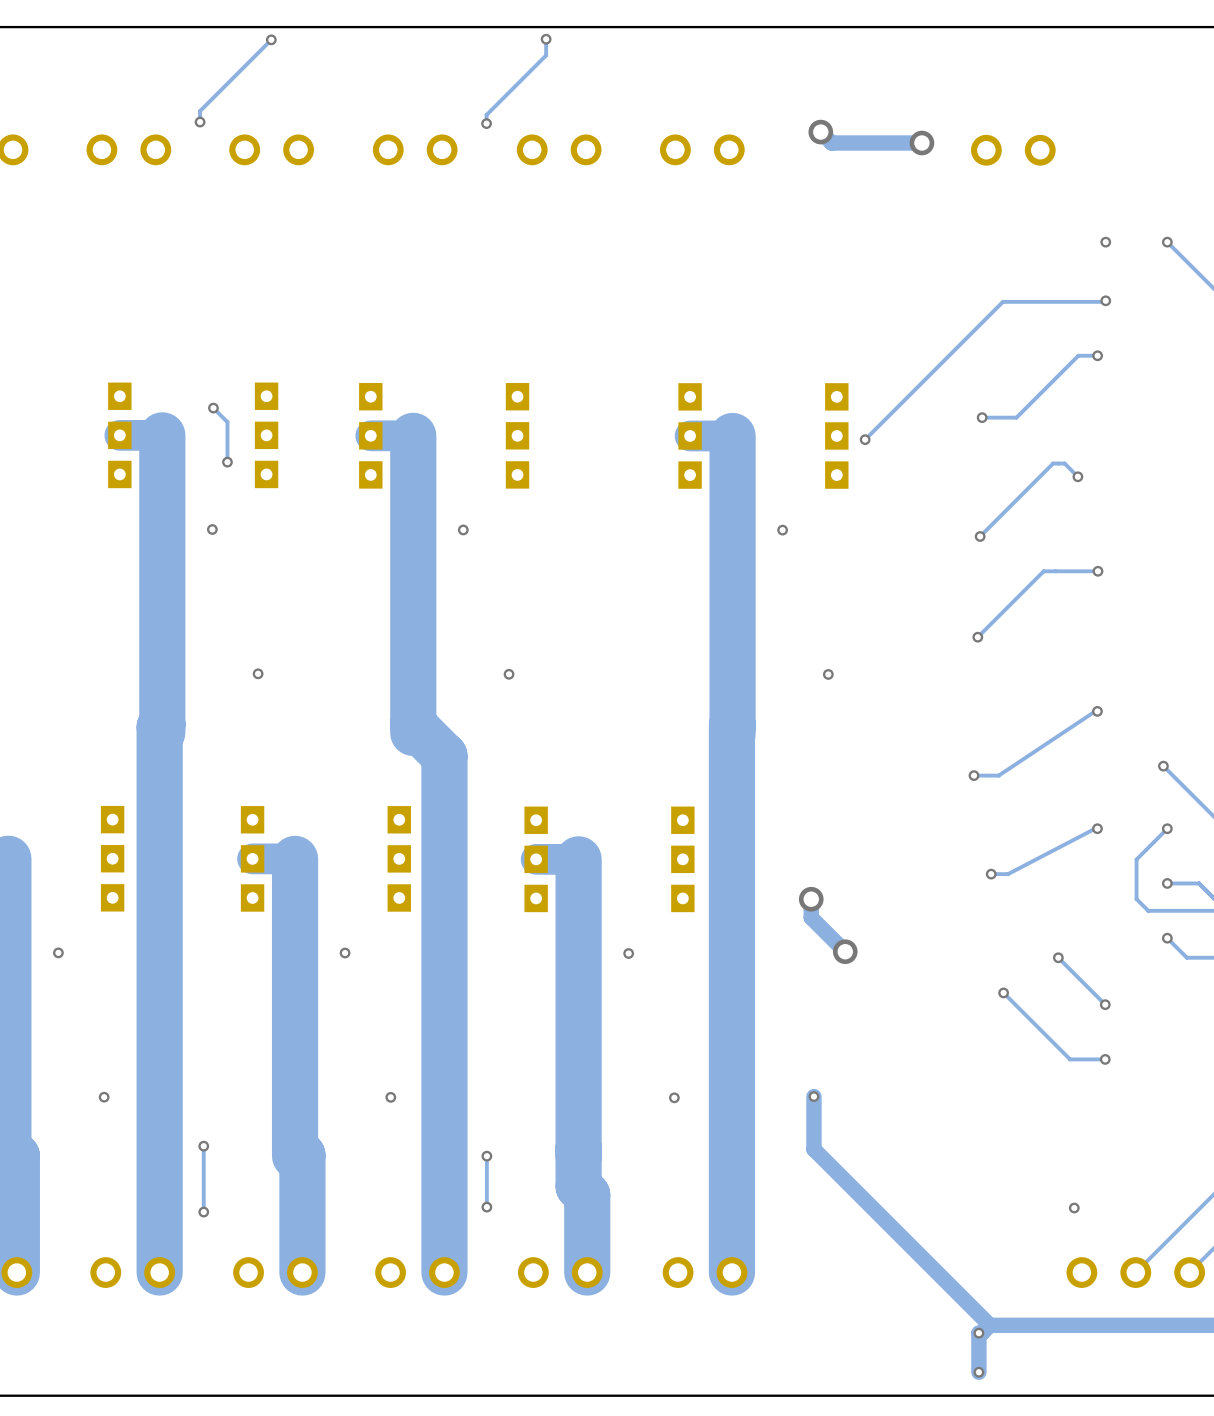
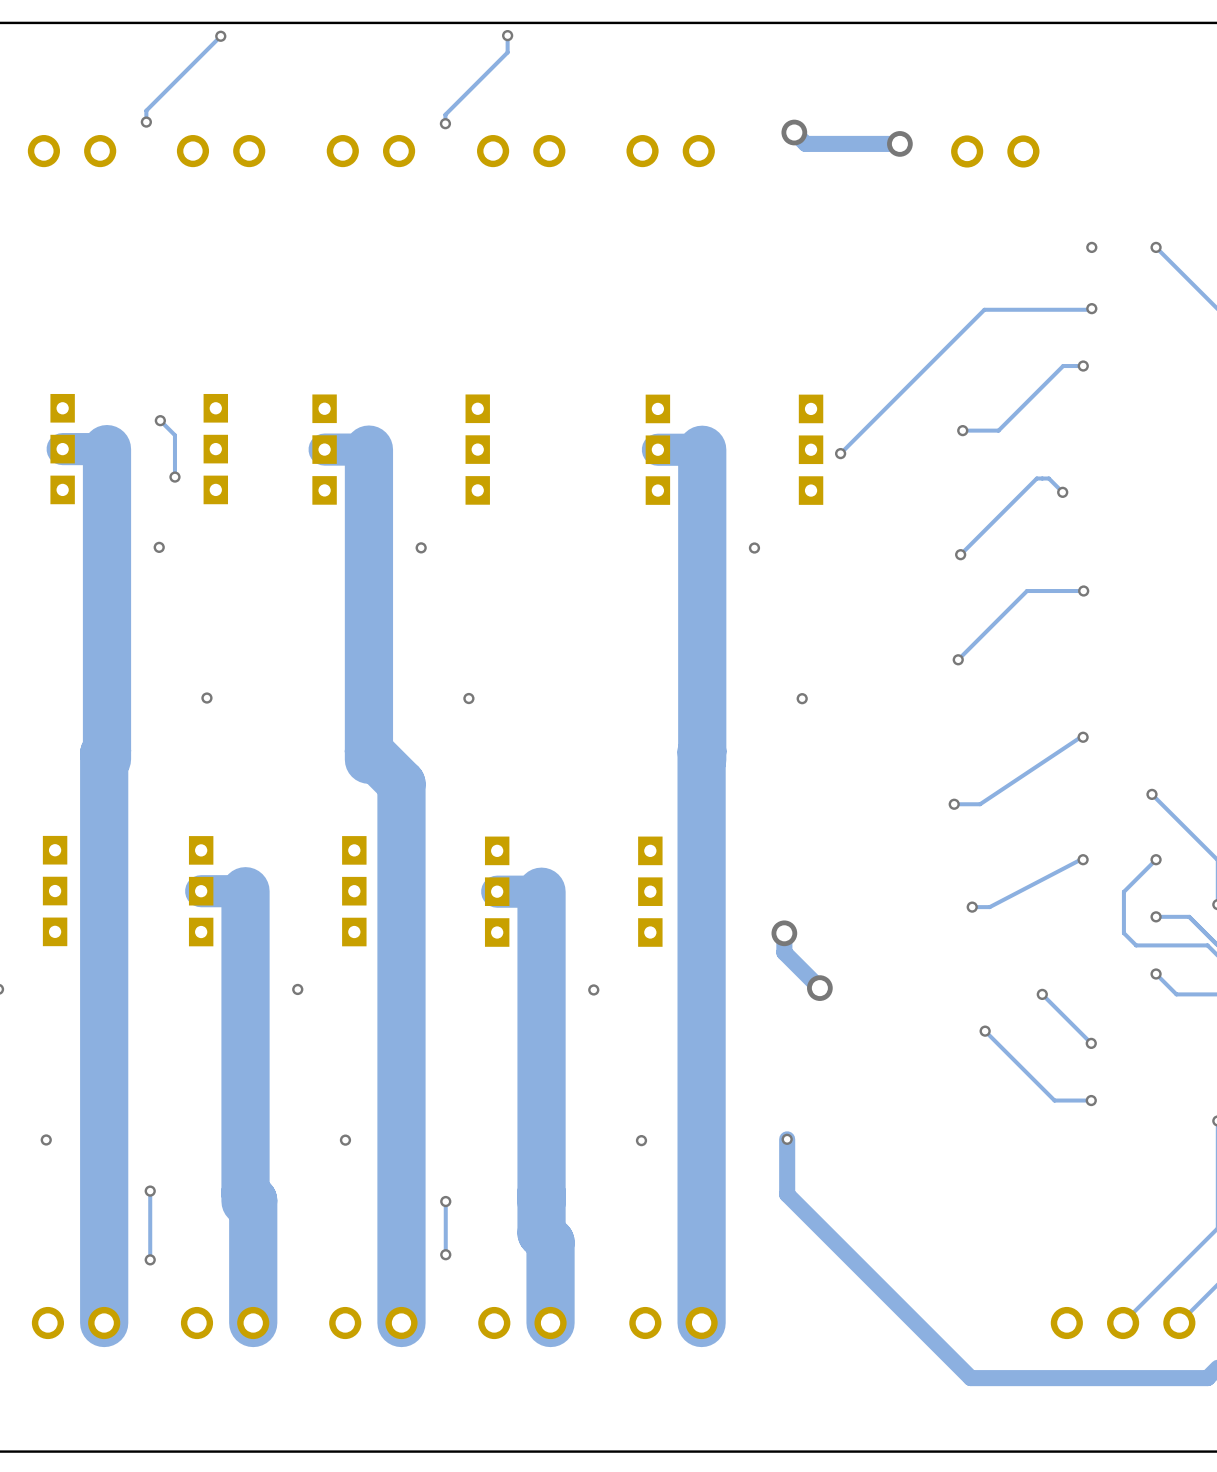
via: (1074, 1208) -> none
track: (989, 1325) (982, 1333) (978, 1333) (978, 1372) -> none
via: (978, 1333) -> none
via: (978, 1372) -> none

